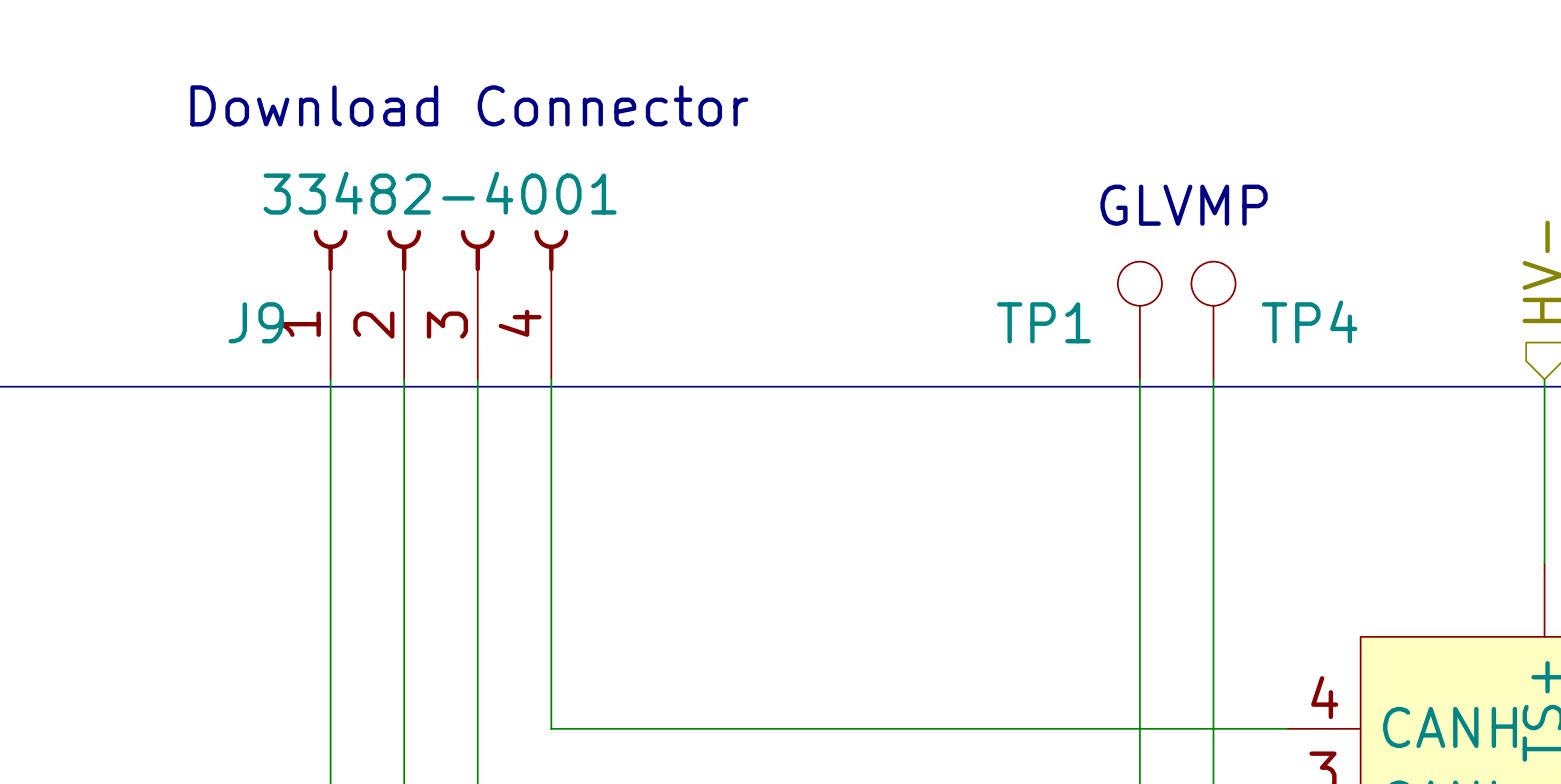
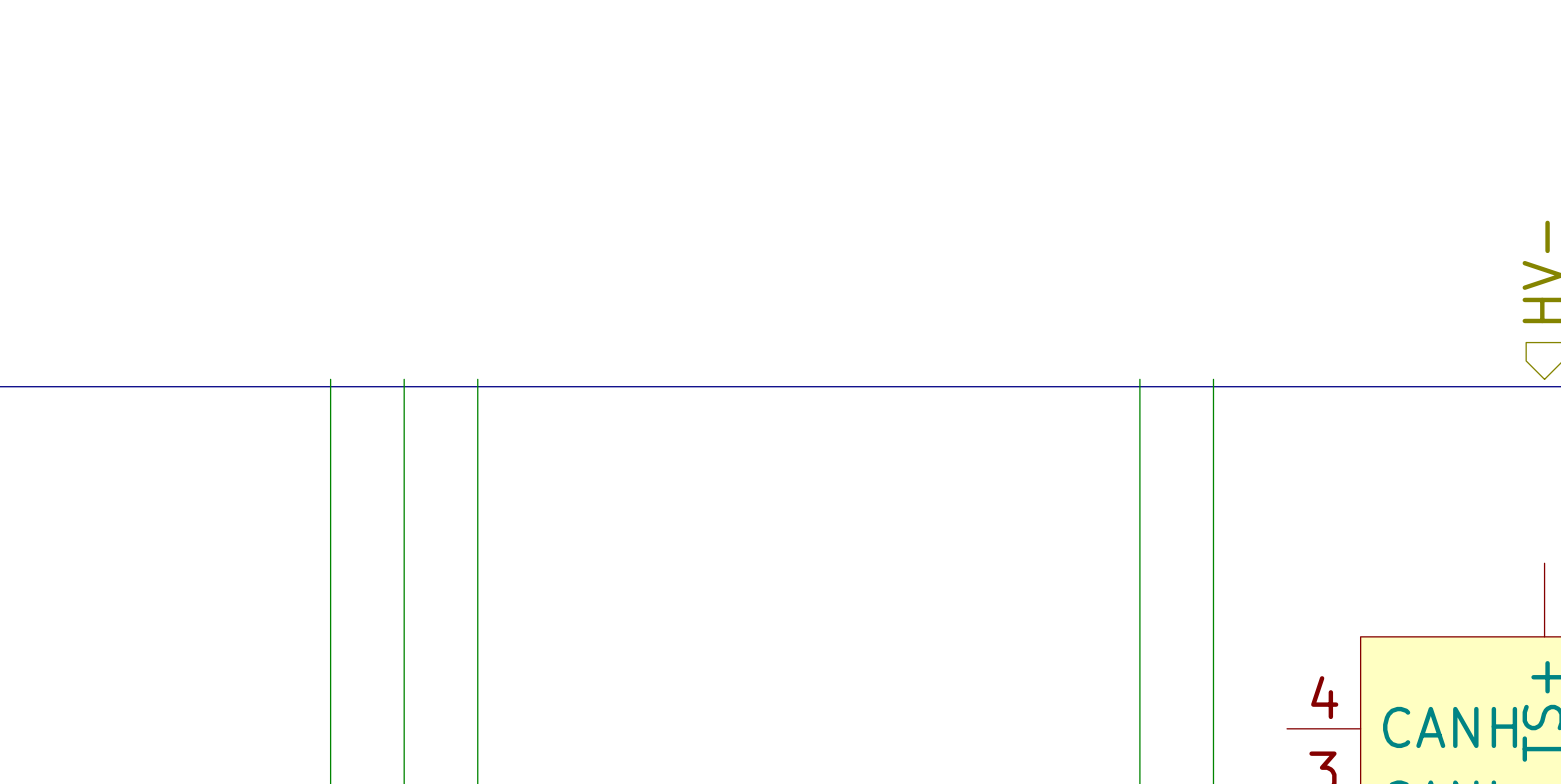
text: Download Connector (469, 105) -> none
text: GLVMP (1184, 205) -> none
J9: 33482-4001 (440, 304) -> none
TP1: (1139, 320) -> none
TP4: (1213, 320) -> none
wire: (551, 379) (551, 728) (1287, 728) -> none
wire: (1544, 379) (1544, 563) -> none

